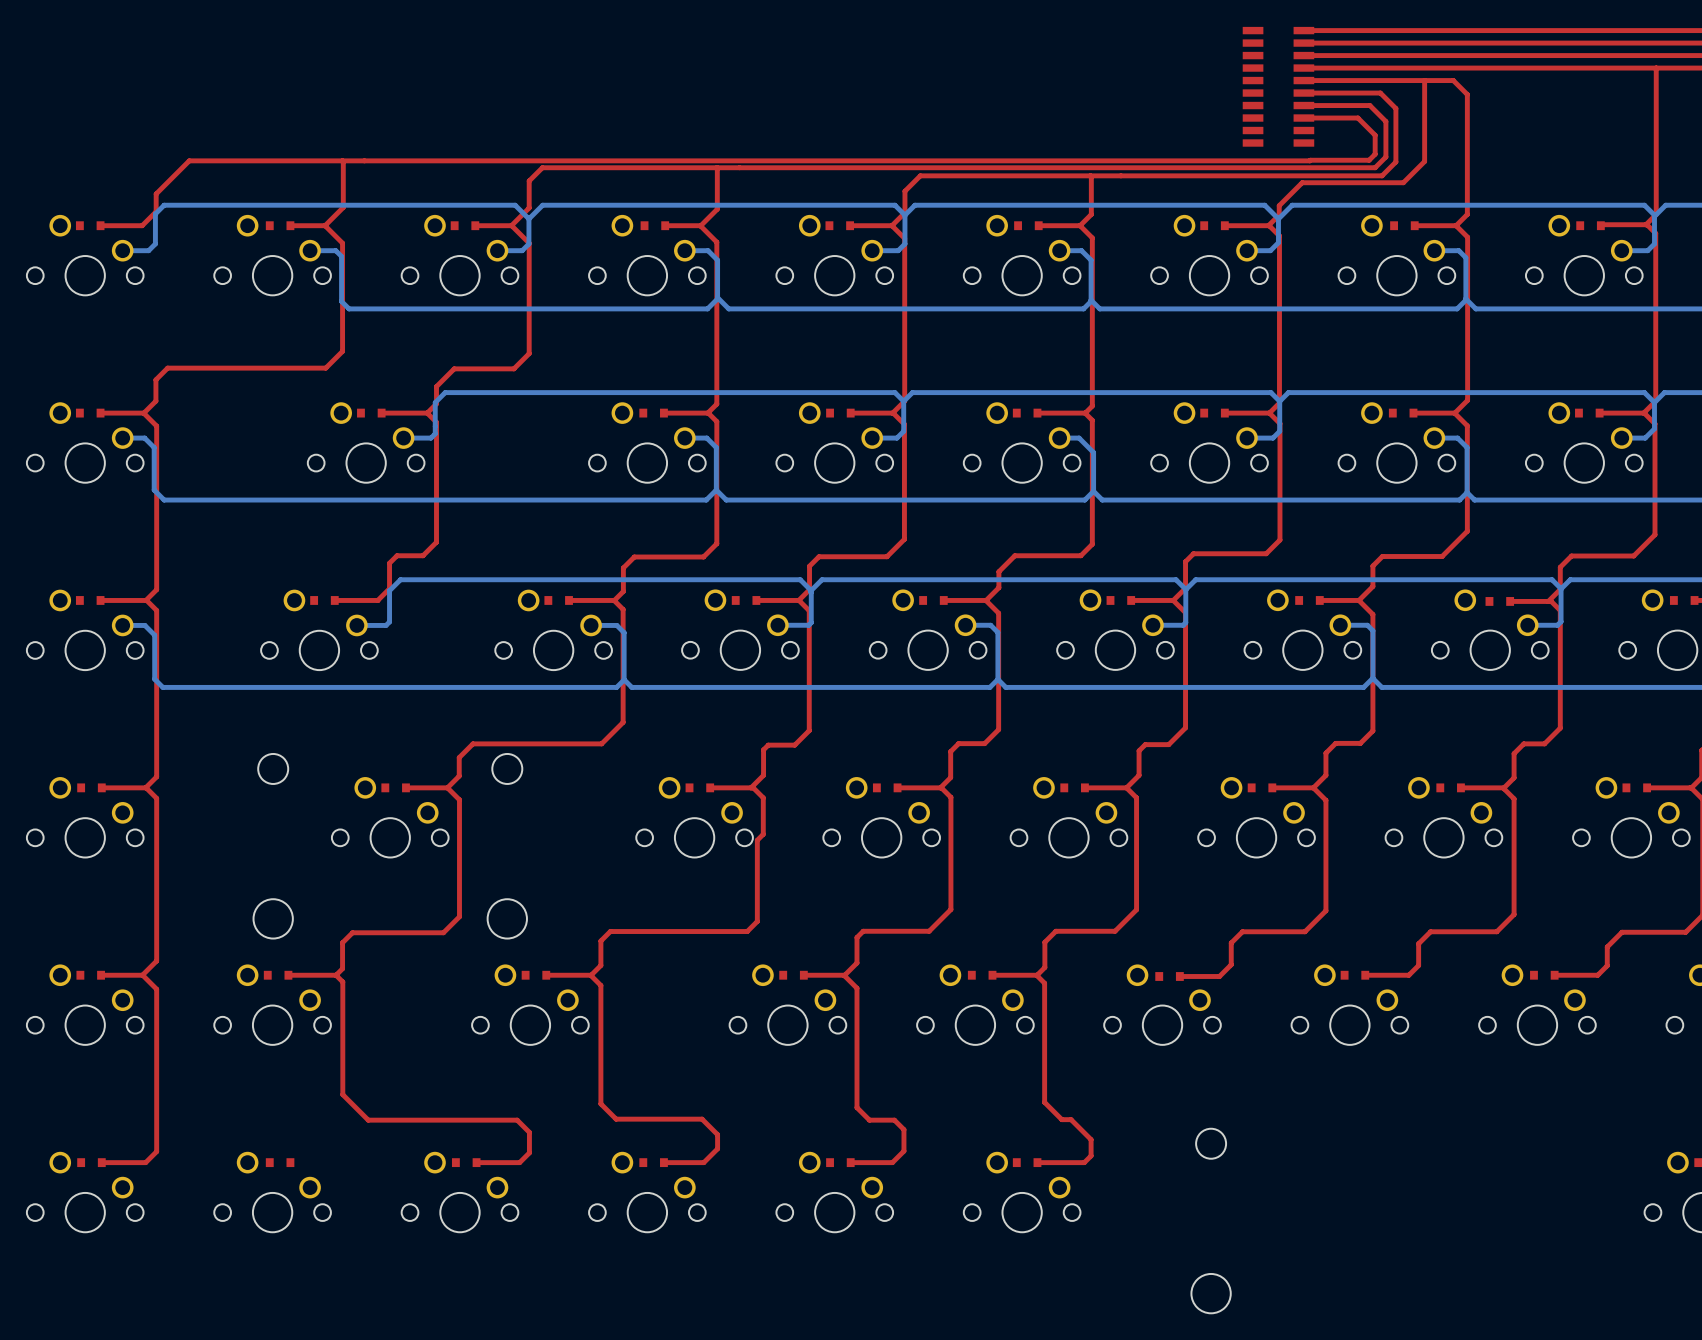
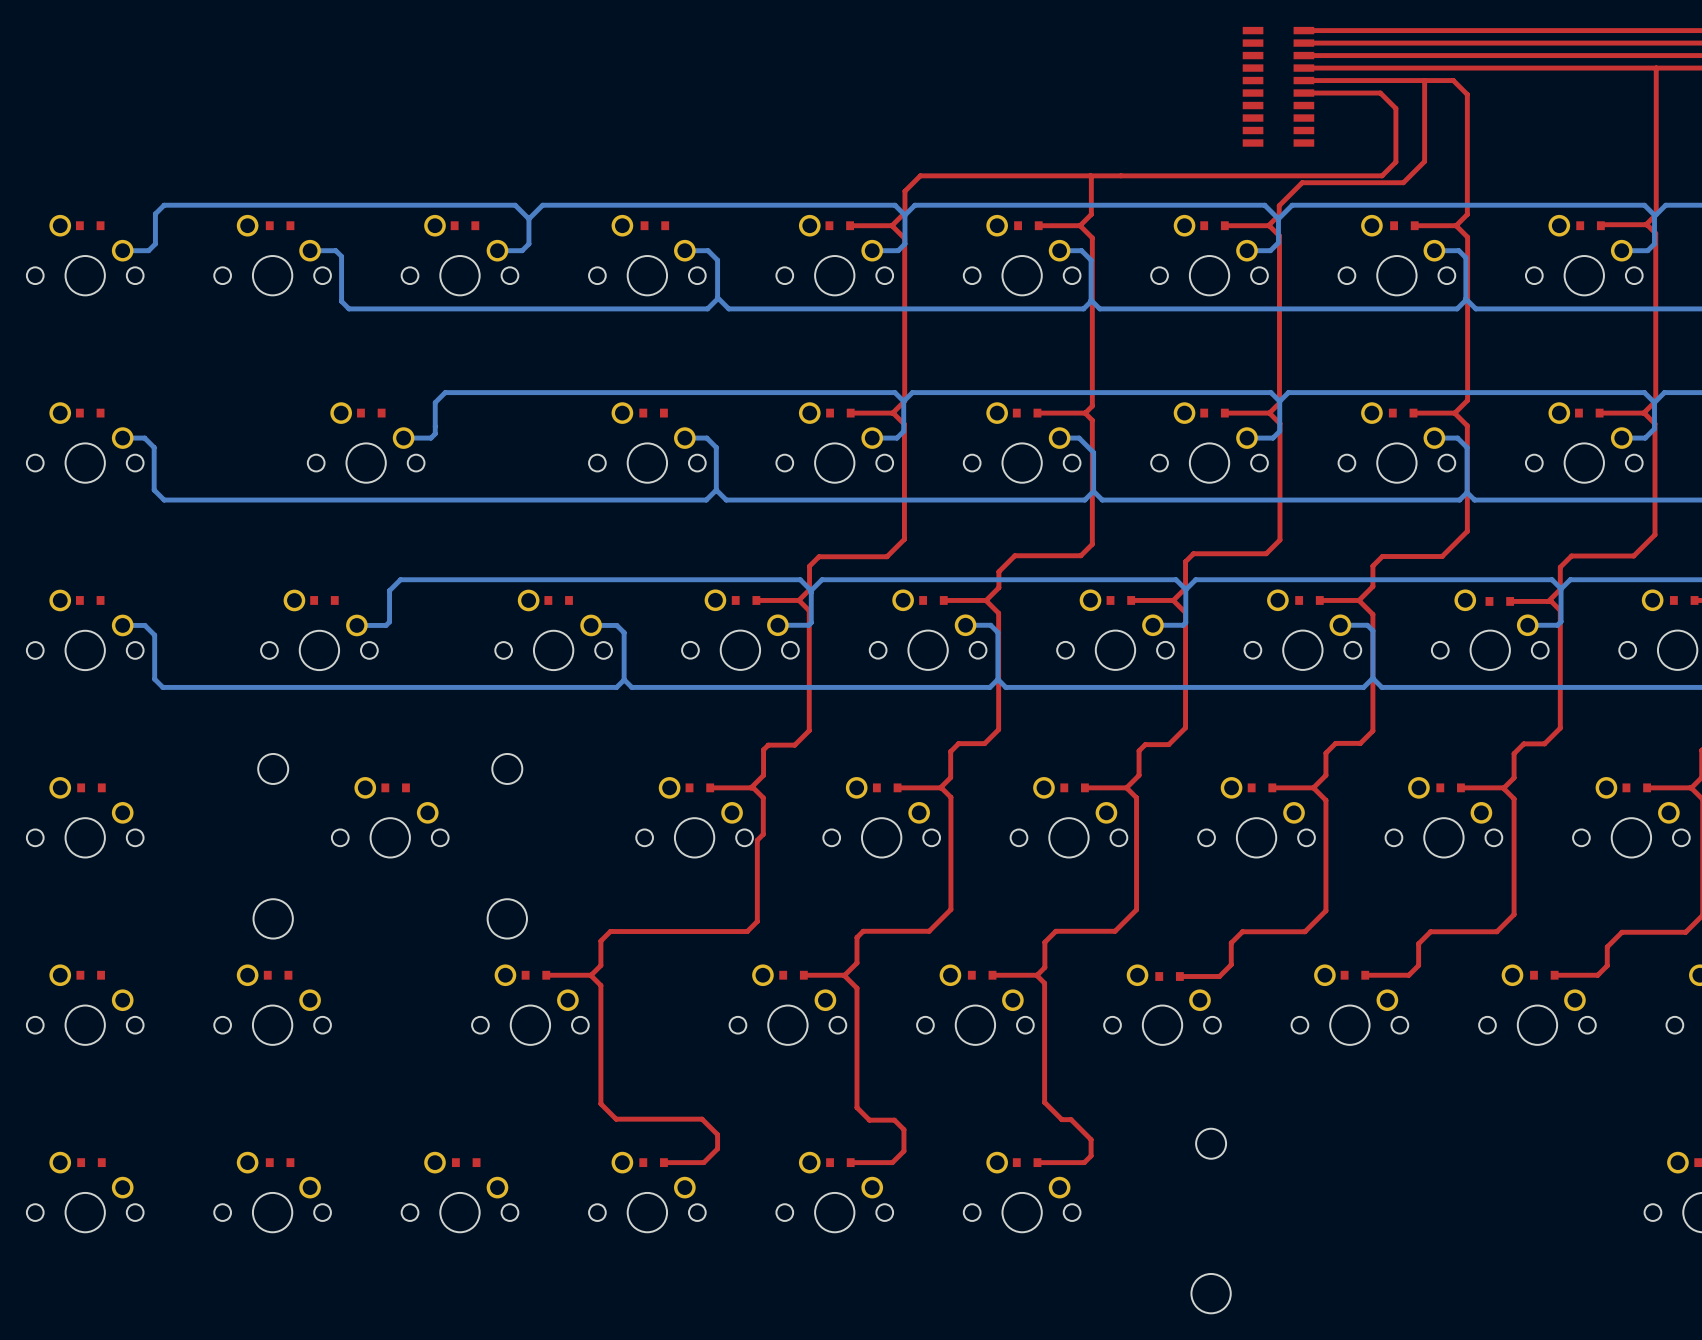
top track: (1303, 105) (1369, 105) (1385, 121) (1385, 157) (1375, 167) (542, 167) (529, 180) (529, 207) (511, 225) -> none
top track: (1303, 118) (1357, 118) (1375, 135) (1375, 154) (1369, 160) (1309, 160) (189, 160) (156, 193) (156, 211) (142, 225) (100, 225) -> none
top track: (342, 160) (343, 207) (325, 225) -> none
top track: (717, 167) (717, 209) (700, 225) -> none
top track: (325, 225) (290, 225) -> none
top track: (325, 225) (342, 243) (342, 351) (325, 368) (167, 368) (155, 379) (155, 401) (143, 413) -> none
top track: (475, 225) (511, 225) (529, 243) (529, 353) (513, 368) (454, 368) (436, 386) (436, 403) (427, 413) -> none
top track: (700, 225) (665, 225) -> none
top track: (700, 225) (716, 242) (716, 404) (707, 413) -> none
top track: (143, 413) (100, 413) -> none
top track: (143, 413) (156, 426) (156, 589) (145, 600) -> none
top track: (427, 413) (381, 413) -> none
top track: (427, 413) (436, 422) (436, 542) (423, 555) (397, 555) (389, 563) (389, 588) (377, 600) -> none
top track: (663, 413) (708, 413) (716, 421) (716, 543) (703, 557) (634, 557) (623, 567) (623, 591) (614, 600) -> none
top track: (100, 600) (146, 600) (156, 610) (156, 776) (145, 787) -> none
top track: (378, 600) (334, 600) -> none
top track: (614, 600) (569, 600) -> none
top track: (614, 600) (623, 609) (623, 722) (601, 743) (472, 743) (459, 757) (459, 776) (447, 787) -> none
top track: (101, 787) (146, 787) (156, 798) (156, 961) (142, 975) -> none
top track: (447, 787) (405, 787) -> none
top track: (447, 787) (459, 799) (459, 916) (443, 932) (352, 932) (342, 942) (342, 968) (336, 975) -> none
top track: (101, 975) (142, 975) (156, 989) (156, 1151) (145, 1162) (101, 1162) -> none
top track: (336, 975) (288, 975) -> none
top track: (336, 975) (342, 981) (342, 1094) (368, 1120) (517, 1120) (529, 1132) (529, 1152) (519, 1162) (476, 1162) -> none

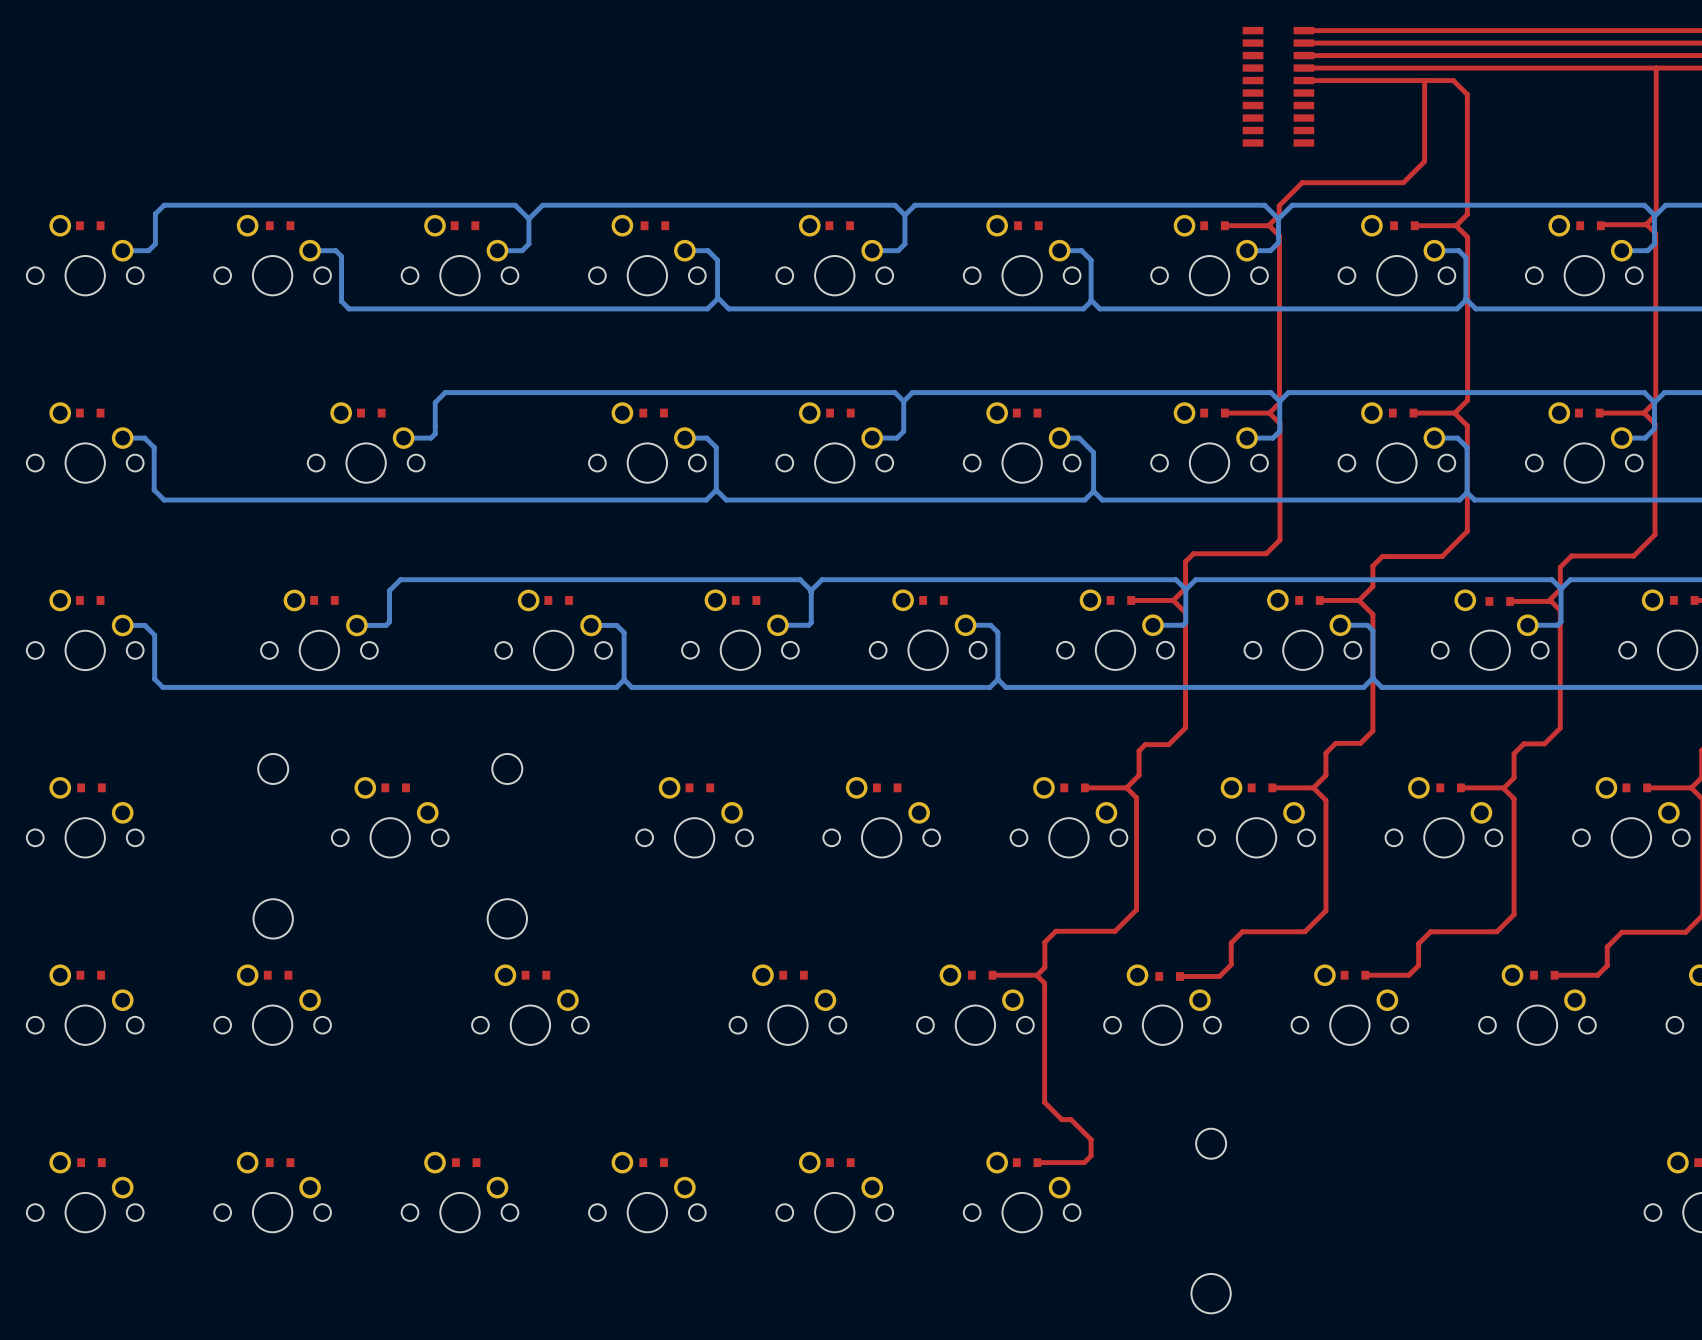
top track: (1303, 93) (1380, 93) (1395, 108) (1395, 162) (1382, 175) (920, 175) (904, 191) (904, 212) (891, 225) -> none
top track: (1090, 175) (1091, 214) (1080, 225) -> none
top track: (891, 225) (850, 225) -> none
top track: (891, 225) (904, 238) (904, 401) (892, 413) -> none
top track: (1080, 225) (1038, 225) -> none
top track: (1080, 225) (1092, 237) (1092, 406) (1085, 413) -> none
top track: (850, 413) (893, 413) (904, 424) (904, 539) (886, 556) (819, 556) (809, 566) (809, 589) (798, 600) -> none
top track: (1085, 413) (1037, 413) -> none
top track: (1085, 413) (1092, 420) (1092, 544) (1080, 555) (1014, 555) (998, 571) (998, 587) (986, 600) -> none
top track: (756, 600) (799, 600) (809, 610) (809, 730) (794, 745) (768, 745) (763, 749) (763, 775) (751, 787) -> none
top track: (986, 600) (943, 600) -> none
top track: (986, 600) (998, 613) (998, 729) (984, 743) (958, 743) (950, 751) (950, 777) (940, 787) -> none
top track: (710, 787) (753, 787) (763, 797) (763, 834) (757, 840) (757, 921) (747, 931) (610, 931) (600, 941) (600, 965) (591, 975) -> none
top track: (897, 787) (941, 787) (950, 797) (950, 909) (929, 931) (863, 931) (856, 937) (856, 963) (844, 975) -> none
top track: (591, 975) (546, 975) -> none
top track: (591, 975) (600, 985) (600, 1103) (616, 1119) (702, 1119) (717, 1134) (717, 1148) (703, 1162) (663, 1162) -> none
top track: (844, 975) (803, 975) -> none
top track: (844, 975) (856, 988) (856, 1107) (869, 1120) (894, 1120) (903, 1129) (903, 1151) (892, 1162) (850, 1162) -> none

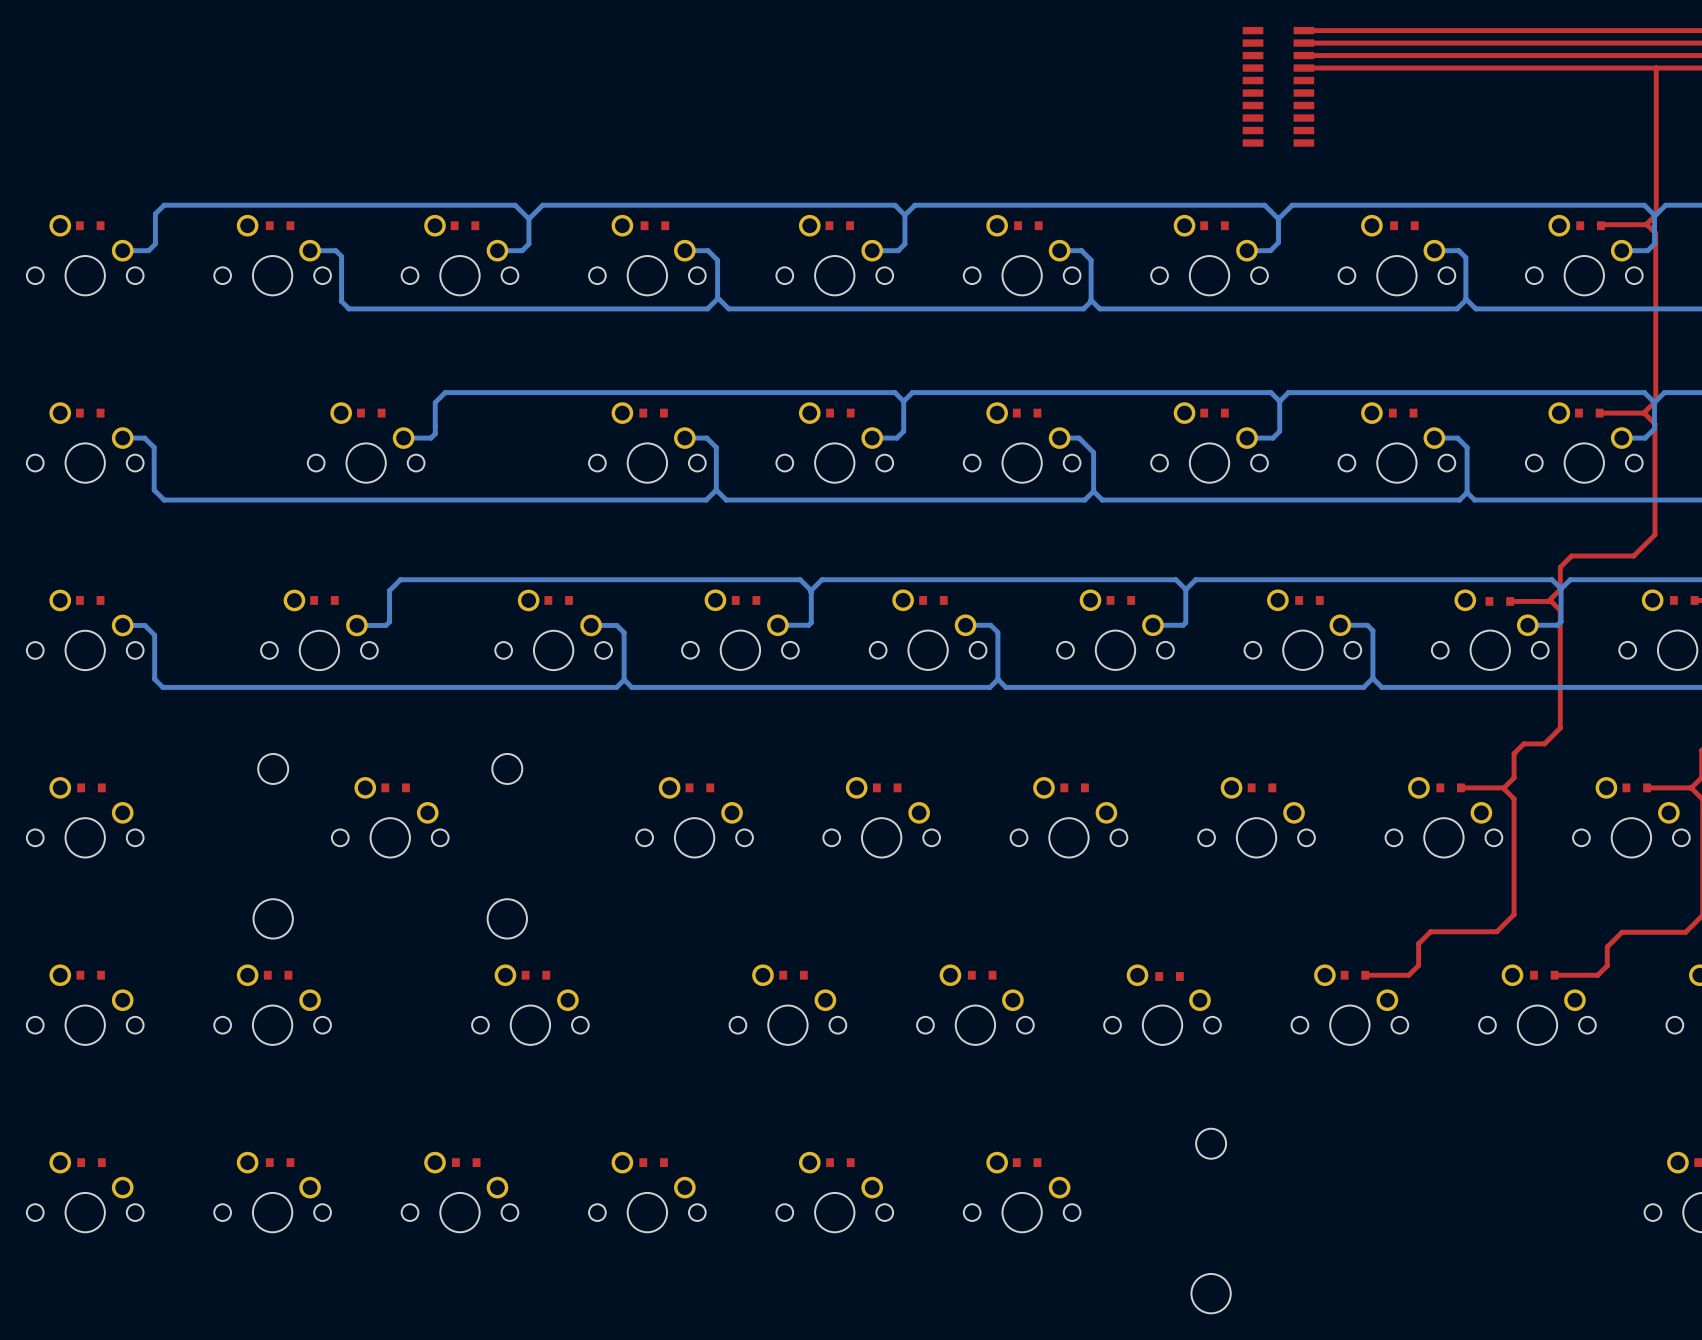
top track: (1303, 80) (1453, 80) (1467, 94) (1467, 214) (1456, 225) -> none
top track: (1424, 80) (1424, 161) (1403, 182) (1302, 182) (1279, 205) (1279, 214) (1268, 225) -> none
top track: (1224, 225) (1269, 225) (1279, 235) (1279, 403) (1269, 413) -> none
top track: (1456, 225) (1414, 225) -> none
top track: (1456, 225) (1467, 237) (1467, 400) (1454, 413) -> none
top track: (1269, 413) (1279, 423) (1279, 540) (1266, 553) (1193, 553) (1185, 561) (1185, 588) (1173, 600) -> none
top track: (1269, 413) (1224, 413) -> none
top track: (1454, 413) (1467, 425) (1467, 531) (1442, 556) (1382, 556) (1372, 565) (1372, 586) (1358, 600) -> none
top track: (1454, 413) (1413, 413) -> none
top track: (1173, 600) (1185, 612) (1185, 727) (1168, 744) (1145, 744) (1139, 750) (1139, 775) (1126, 787) -> none
top track: (1173, 600) (1131, 600) -> none
top track: (1358, 600) (1319, 600) -> none
top track: (1358, 600) (1372, 614) (1372, 730) (1360, 743) (1335, 743) (1325, 753) (1325, 775) (1313, 787) -> none
top track: (1126, 787) (1084, 787) -> none
top track: (1126, 787) (1136, 797) (1136, 909) (1115, 931) (1055, 931) (1044, 942) (1044, 967) (1037, 975) -> none
top track: (1313, 787) (1272, 787) -> none
top track: (1313, 787) (1325, 800) (1325, 910) (1304, 931) (1242, 931) (1231, 943) (1231, 964) (1219, 976) (1179, 976) -> none
top track: (1037, 975) (992, 975) -> none
top track: (1037, 975) (1044, 983) (1044, 1102) (1061, 1119) (1071, 1119) (1091, 1139) (1091, 1155) (1084, 1162) (1037, 1162) -> none

